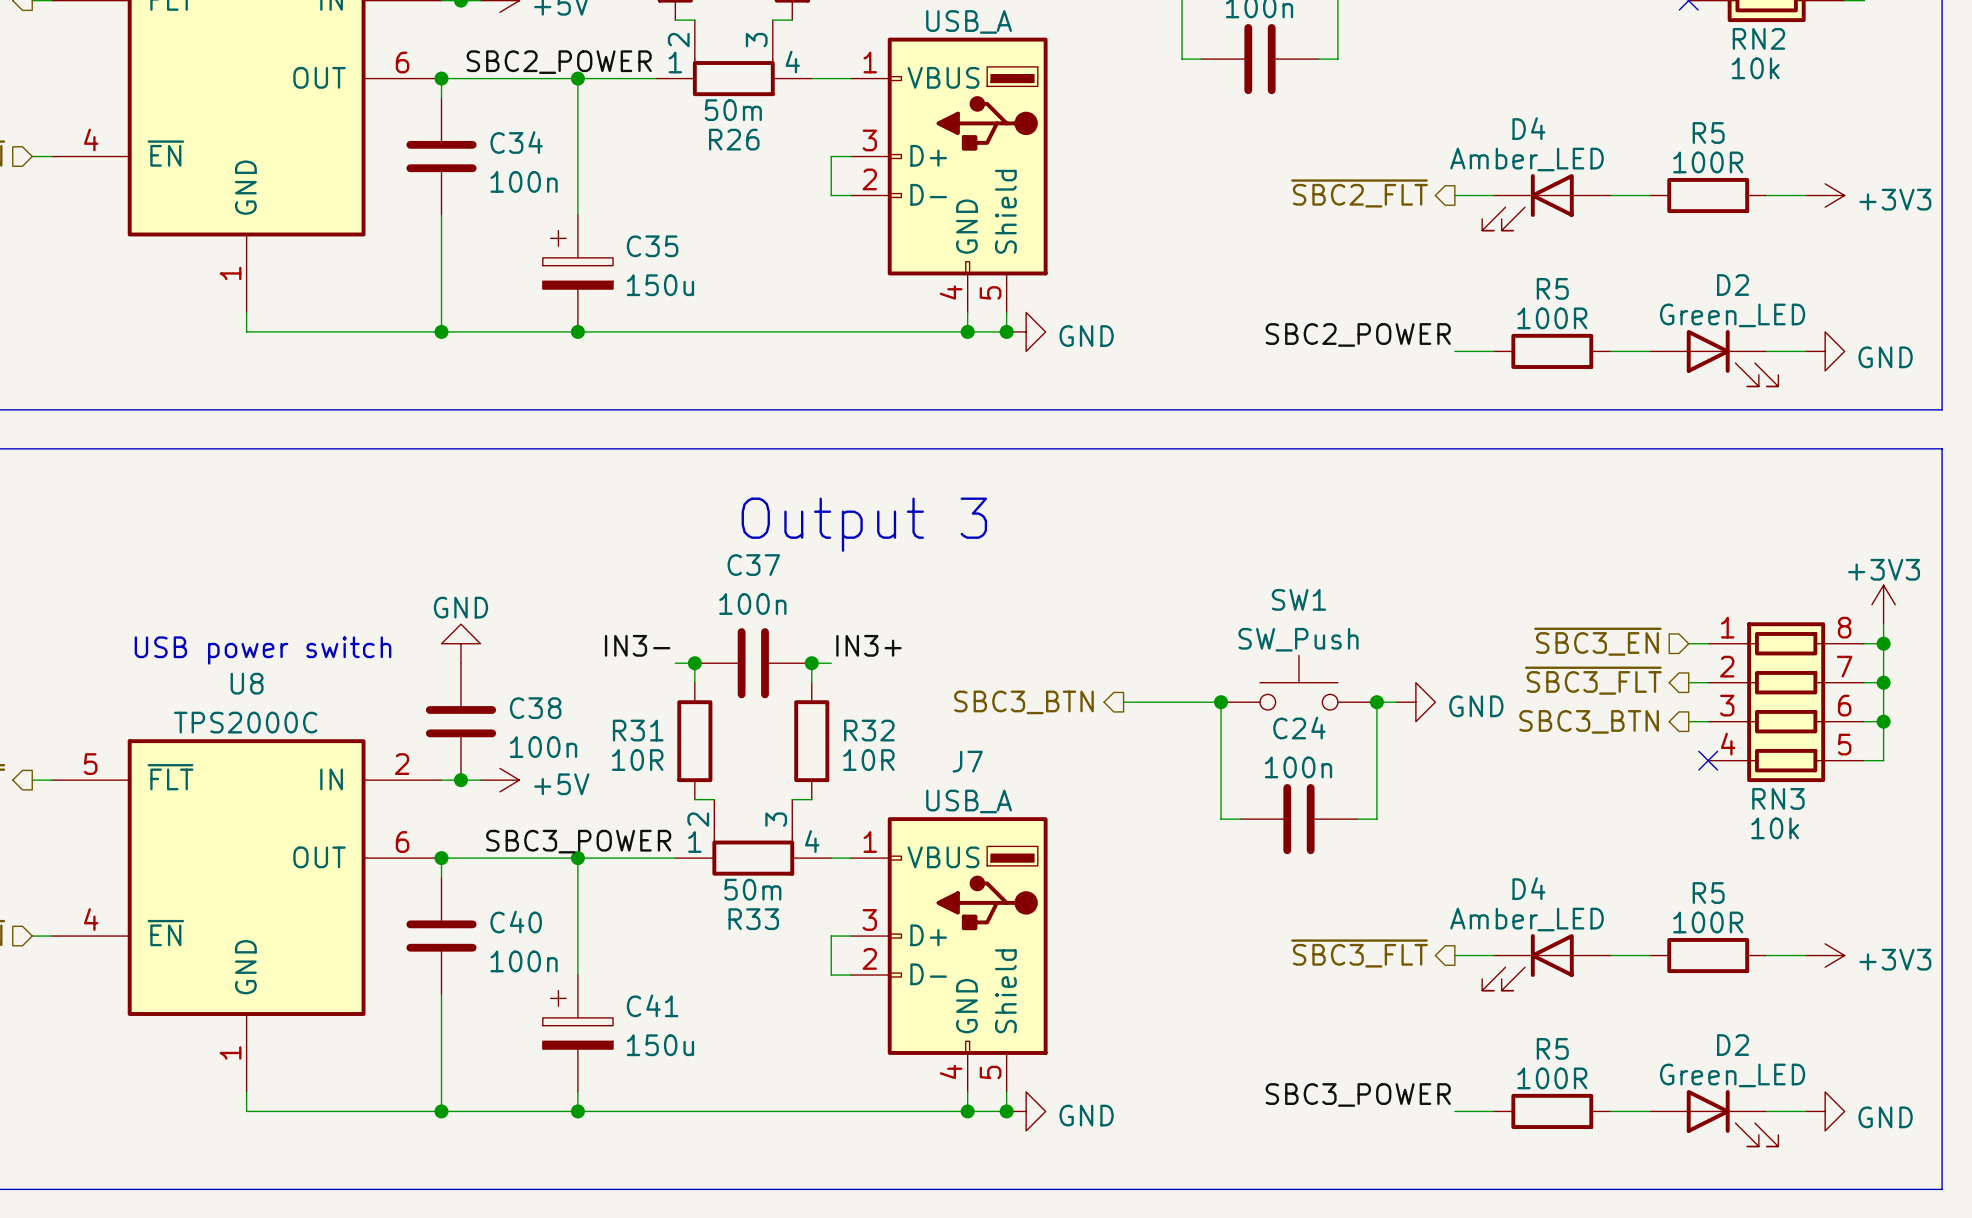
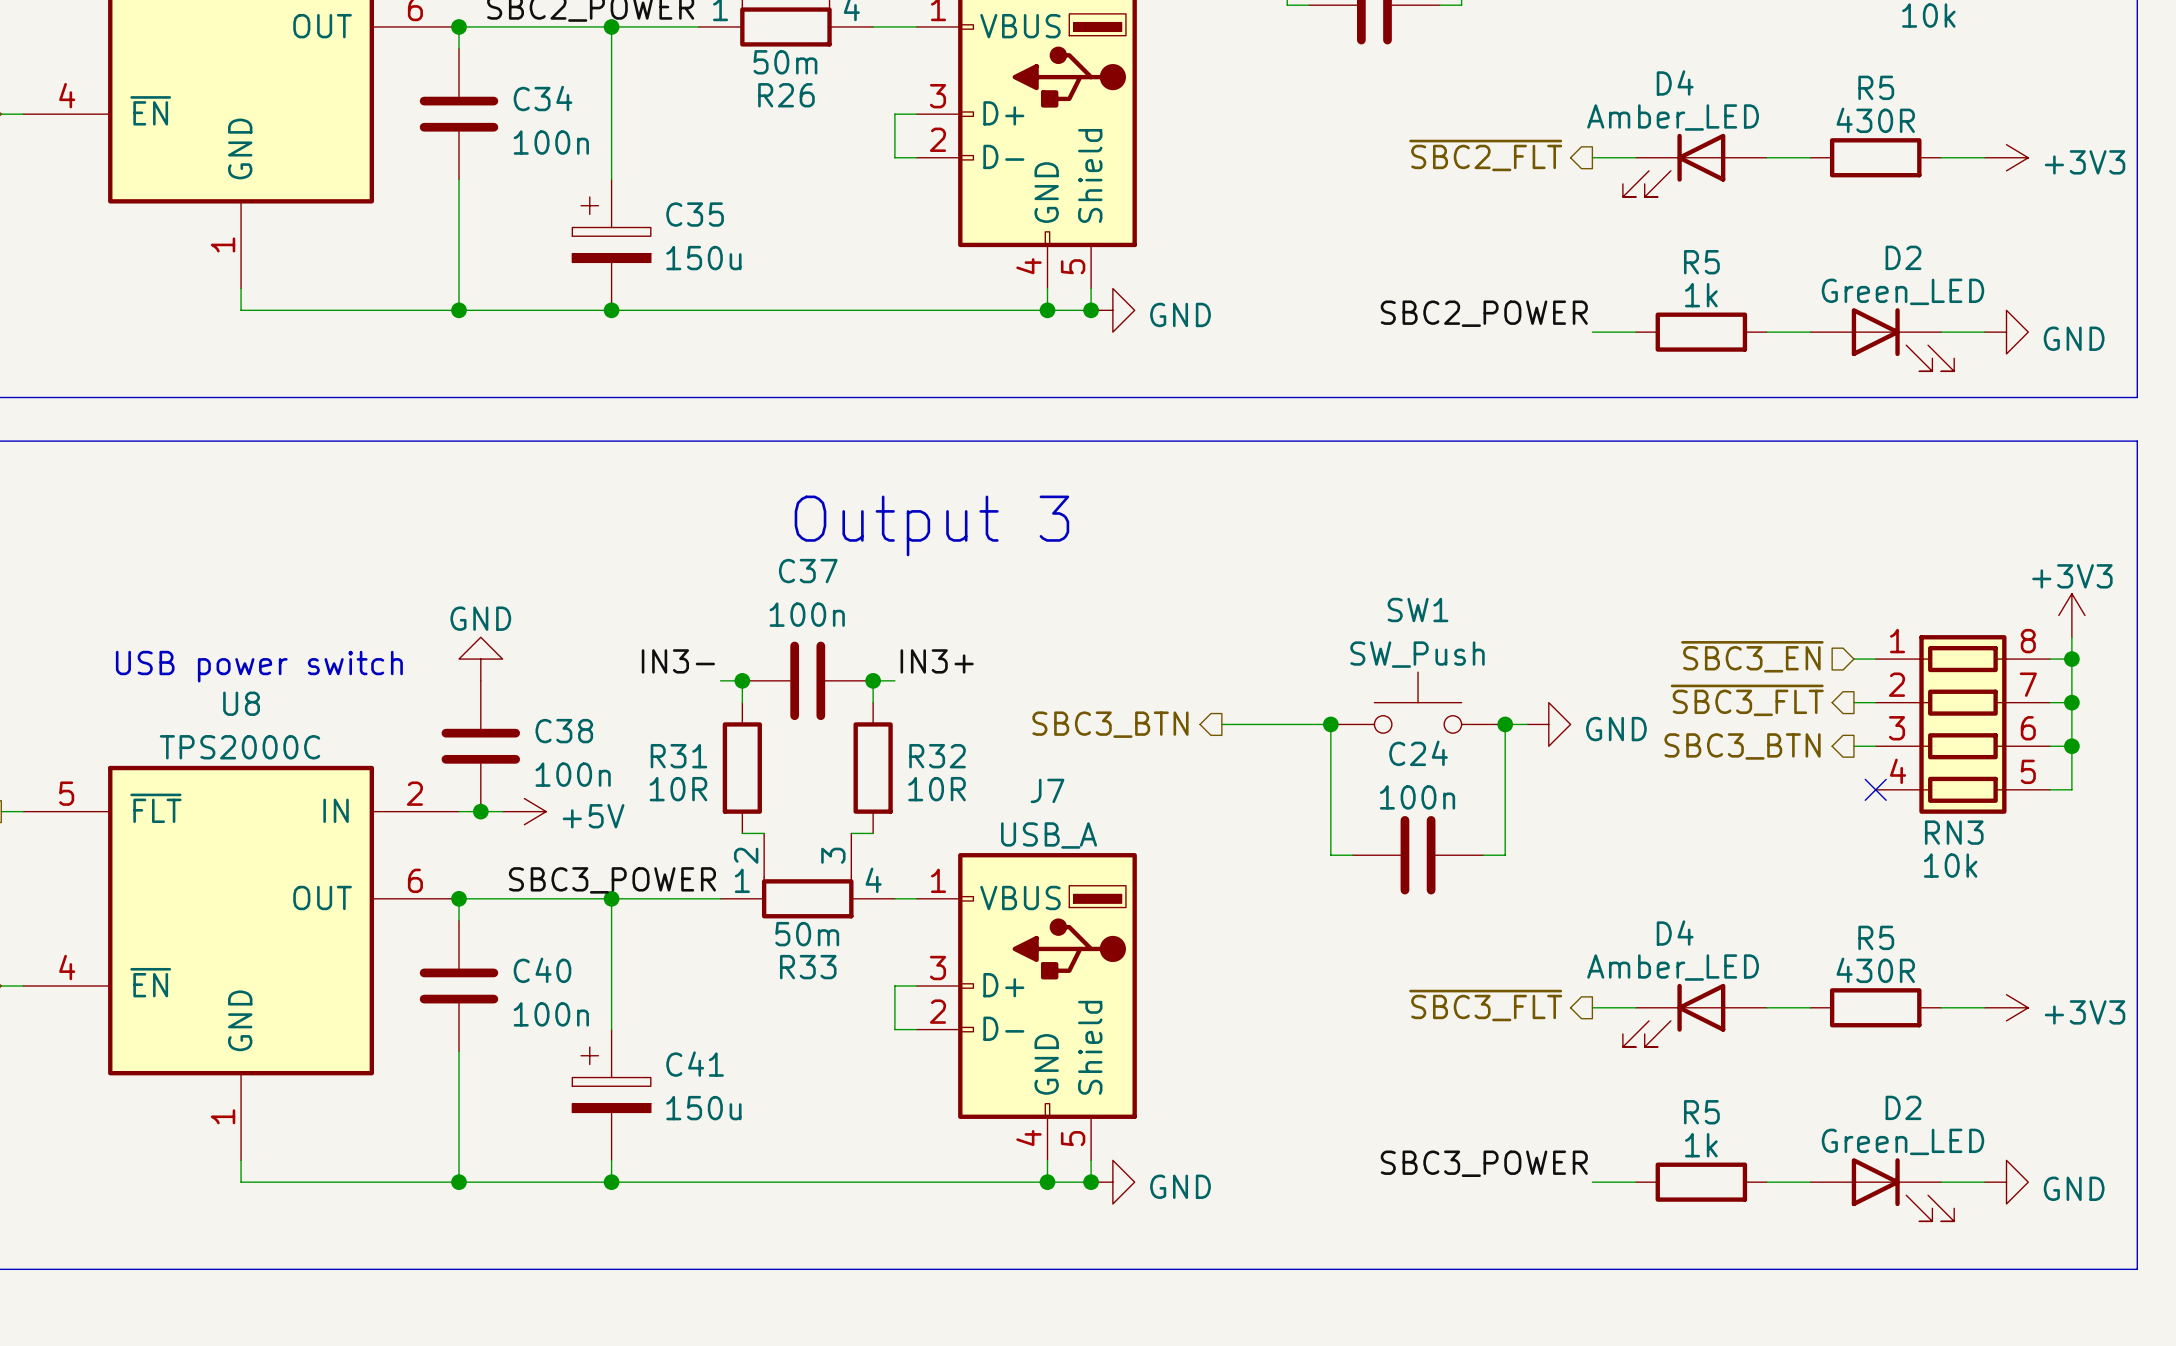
R5 value: 100R (1708, 162) -> 430R (1875, 120)
R5 value: 100R (1552, 318) -> 1k (1701, 295)
R5 value: 100R (1708, 922) -> 430R (1875, 970)
R5 value: 100R (1552, 1078) -> 1k (1701, 1145)

